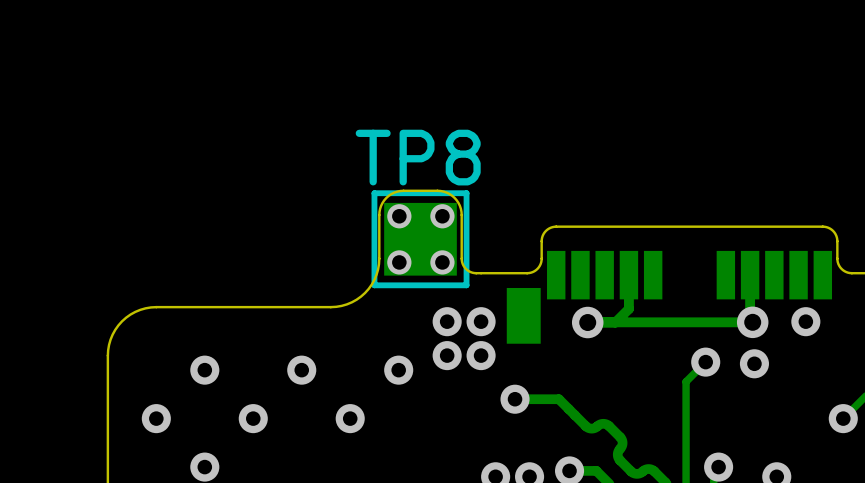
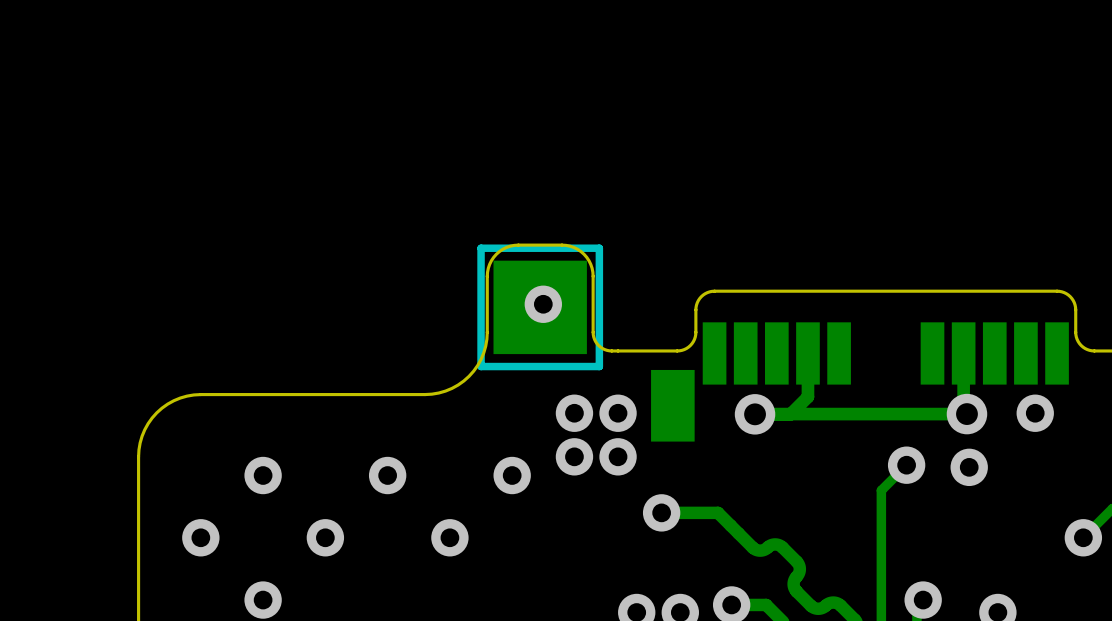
TP8 name: TP8 (418, 157) -> none
via: (399, 216) -> none
via: (442, 216) -> none
via: none -> (543, 304)
via: (399, 262) -> none
via: (442, 262) -> none

